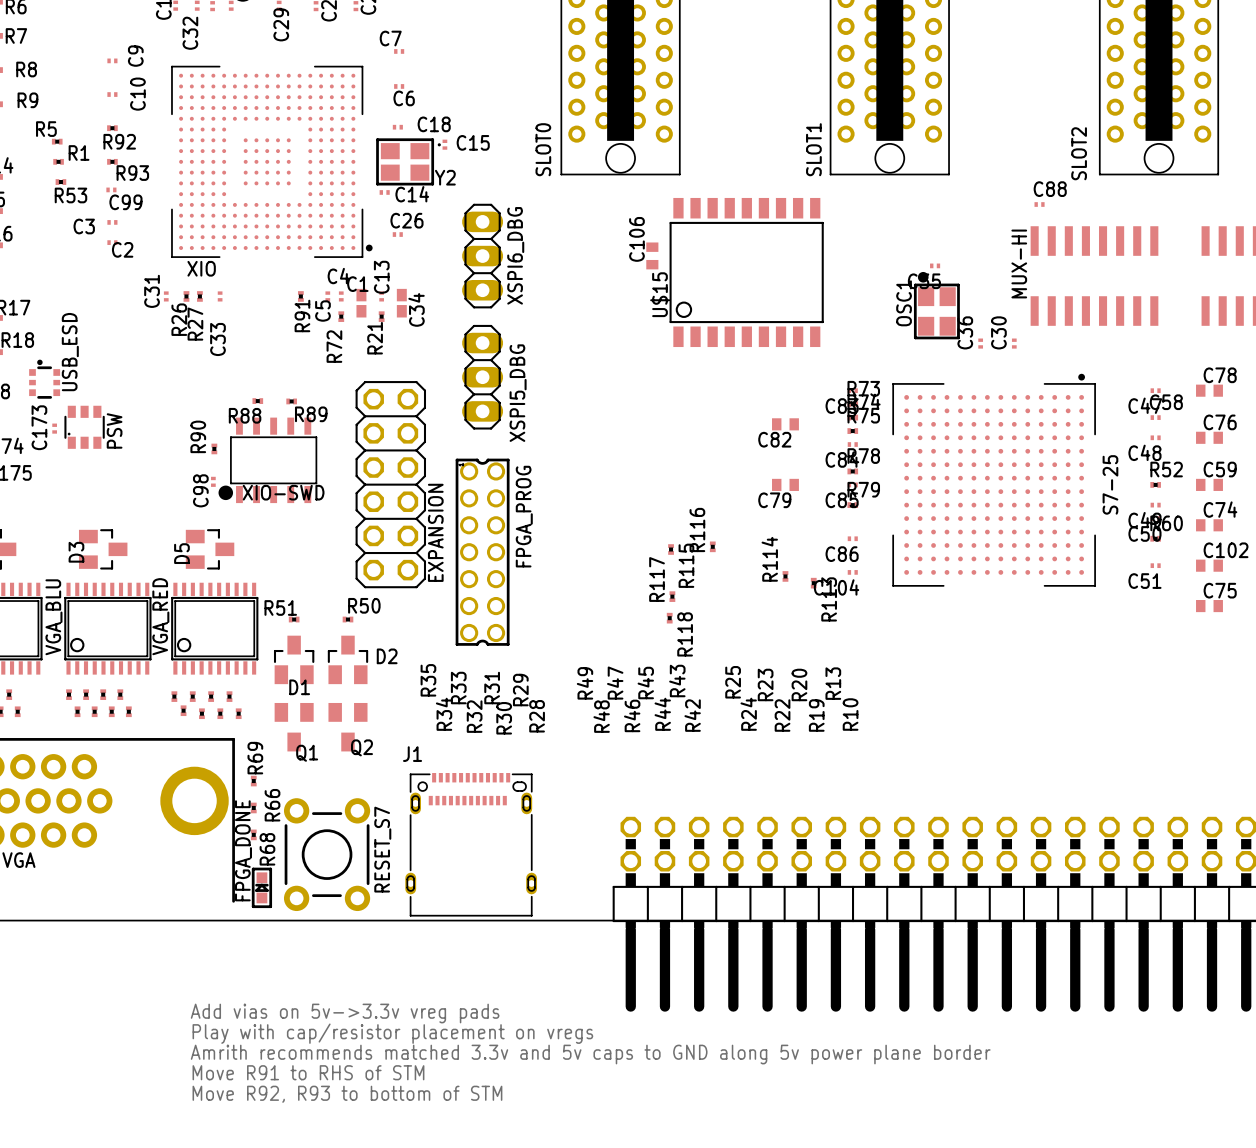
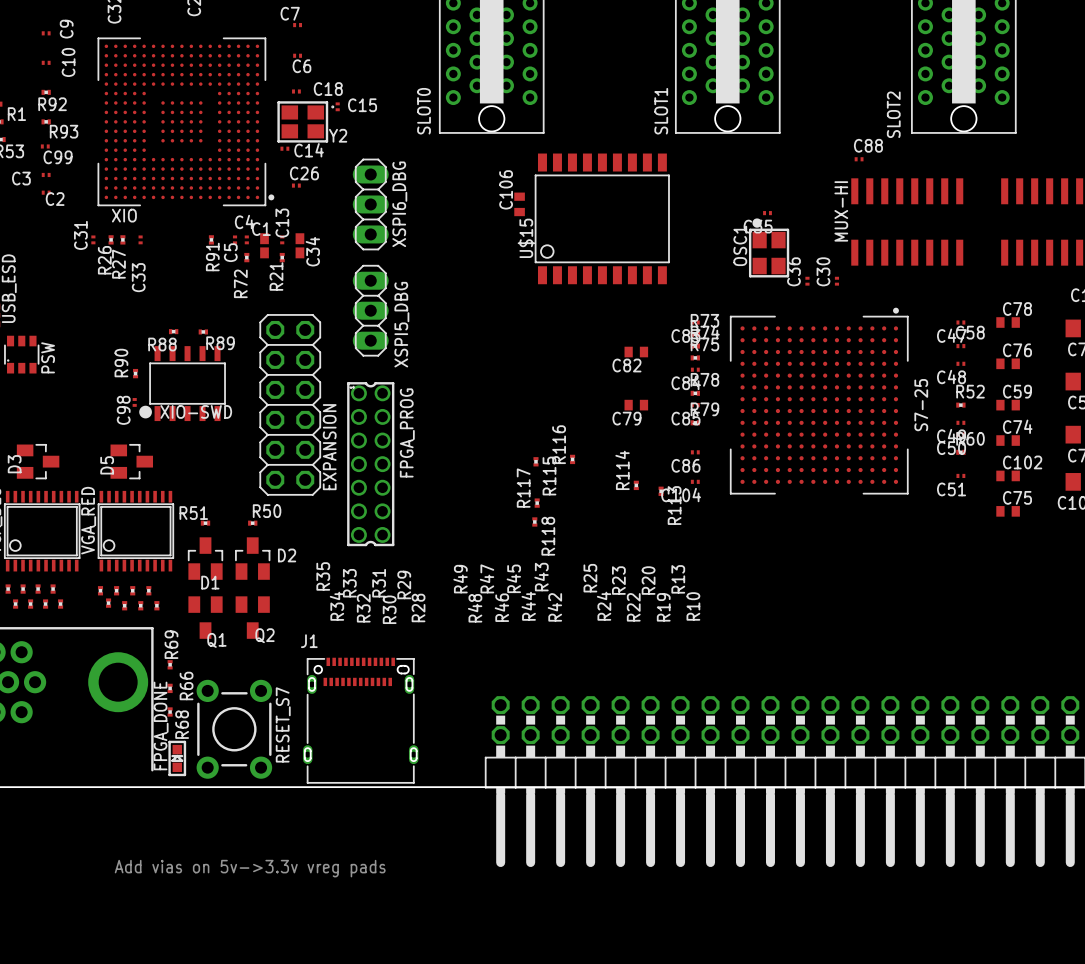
text: Play with cap/resistor placement on vregs (392, 1033) -> none
text: Amrith recommends matched 3.3v and 5v caps to GND along 5v power plane border (590, 1054) -> none
text: Move R91 to RHS of STM (308, 1072) -> none
text: Move R92, R93 to bottom of STM (347, 1094) -> none

